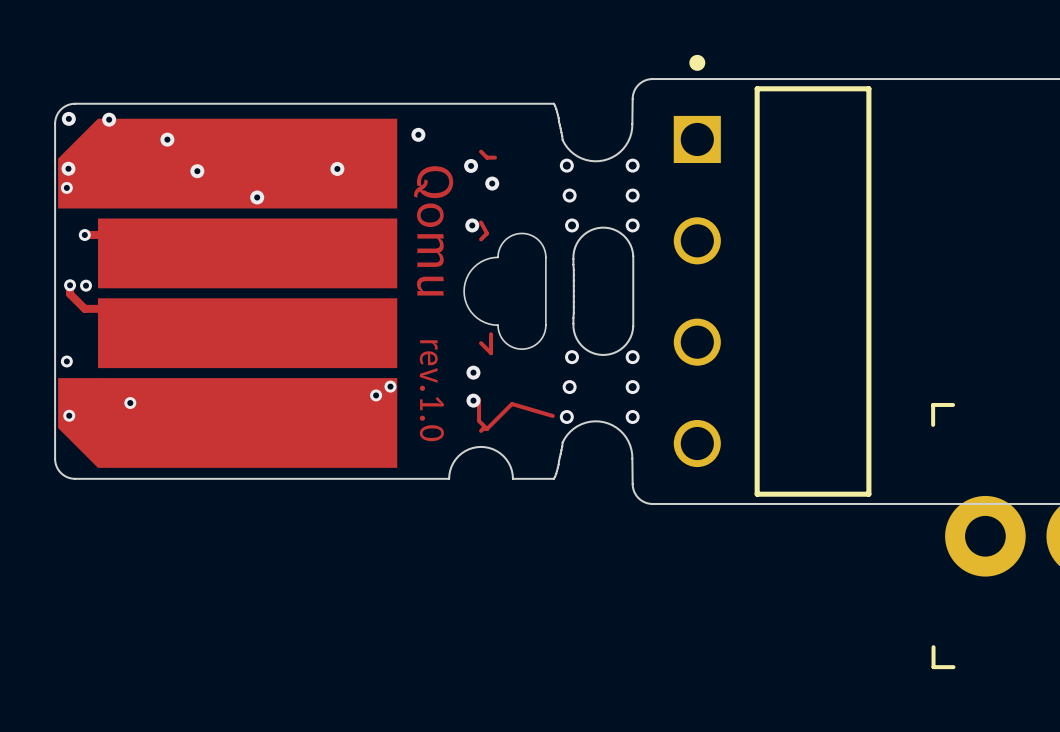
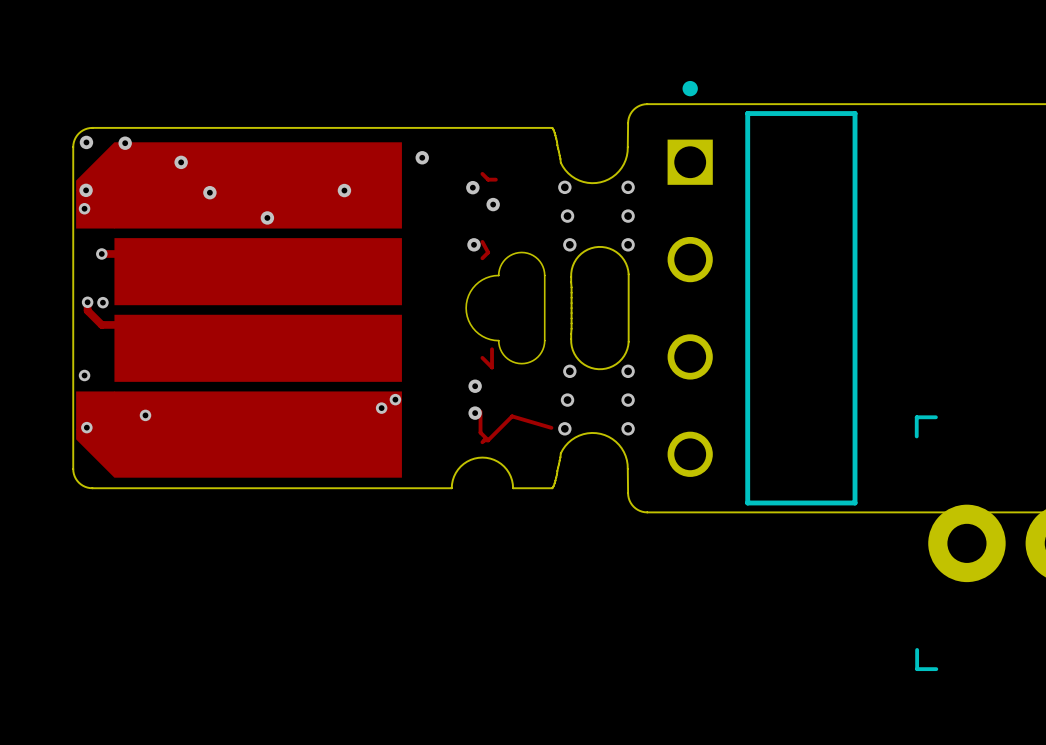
text: Qomu (433, 230) -> none
text: rev.1.0 (431, 390) -> none

